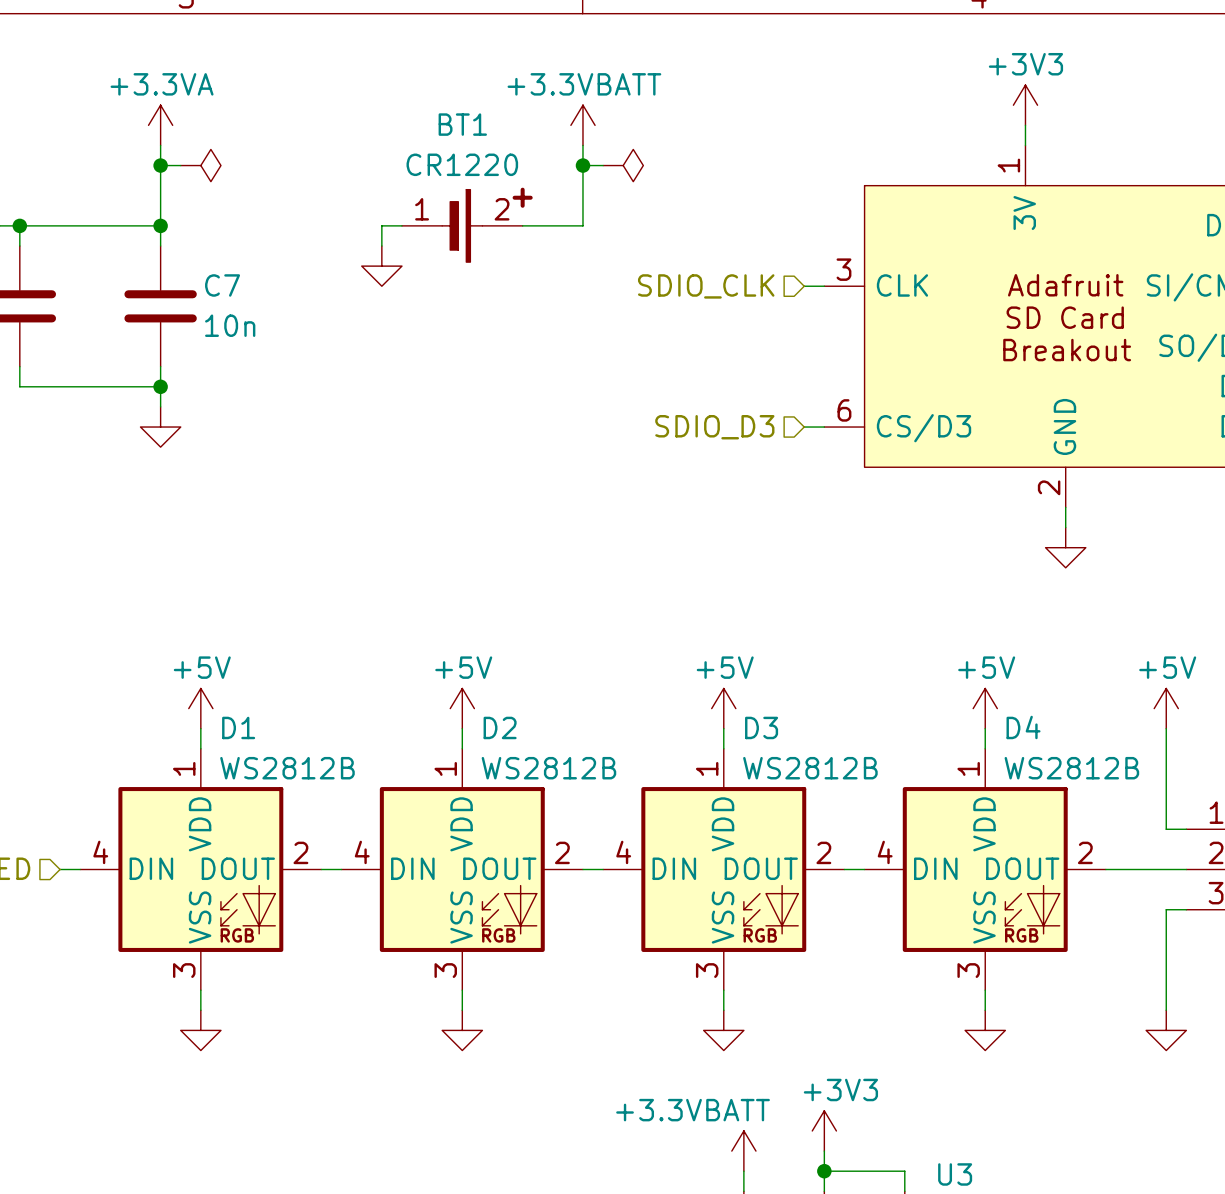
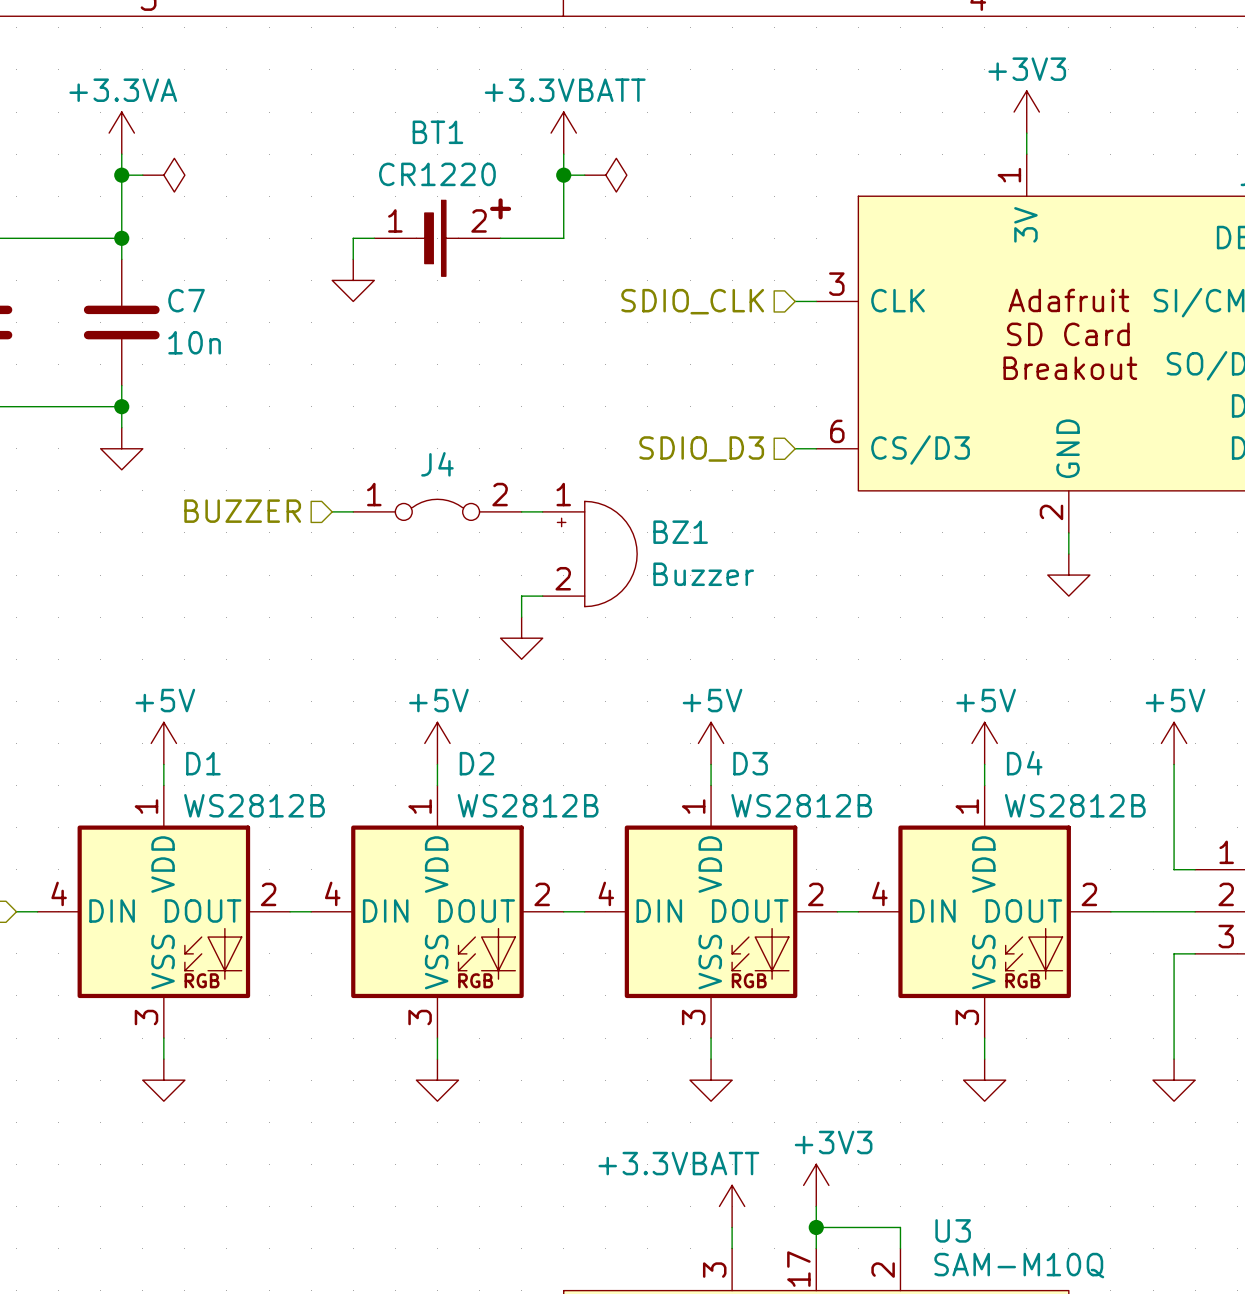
J4: none -> (437, 509)
hierarchical label: none -> BUZZER (242, 511)
wire: none -> (332, 511) (353, 511)
wire: none -> (521, 511) (542, 511)
BZ1: none -> Buzzer (589, 554)
wire: none -> (542, 596) (521, 596) (521, 617)
power symbol: none -> (521, 638)

